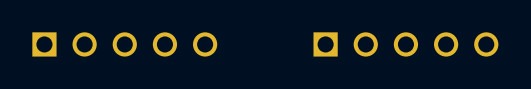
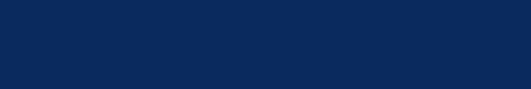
part: (124, 44) -> none
part: (405, 44) -> none

